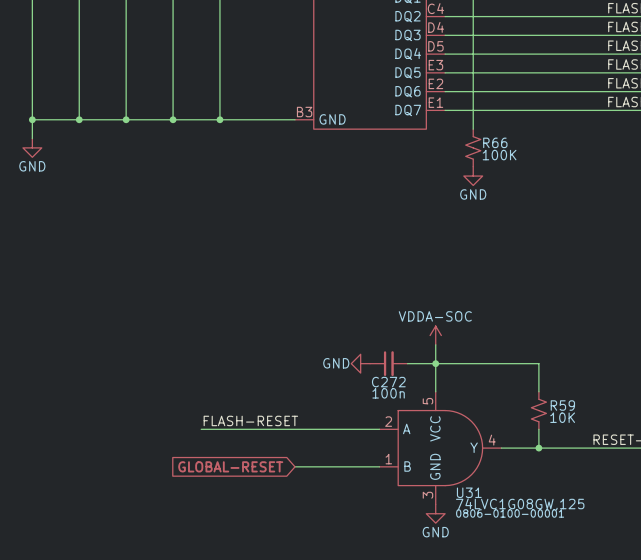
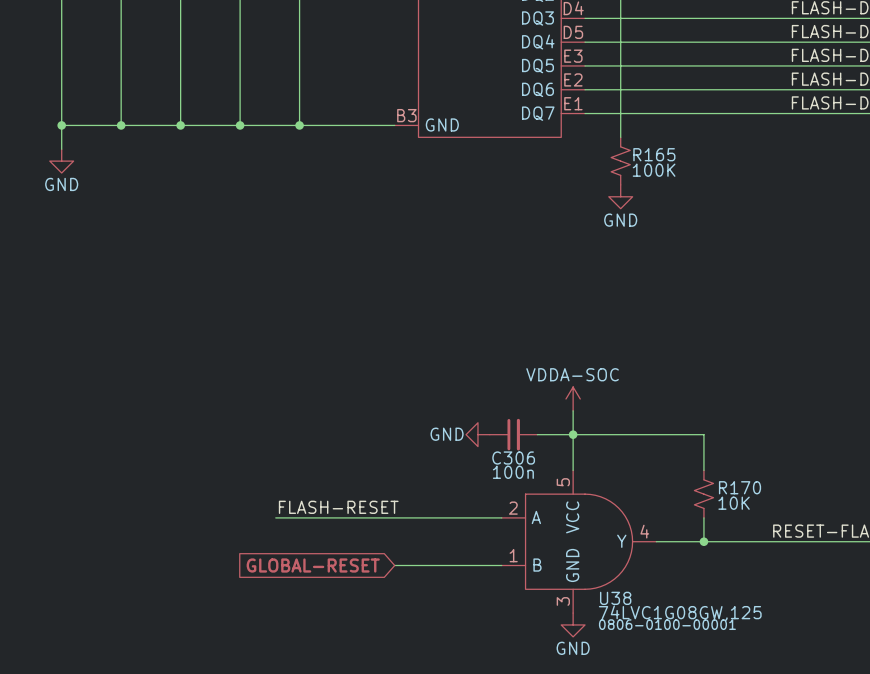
R66 name: R66 (495, 142) -> R165 (654, 154)
C272 name: C272 (388, 382) -> C306 (513, 458)
R59 name: R59 (562, 405) -> R170 (740, 487)
U31 name: U31 (469, 492) -> U38 (615, 598)

